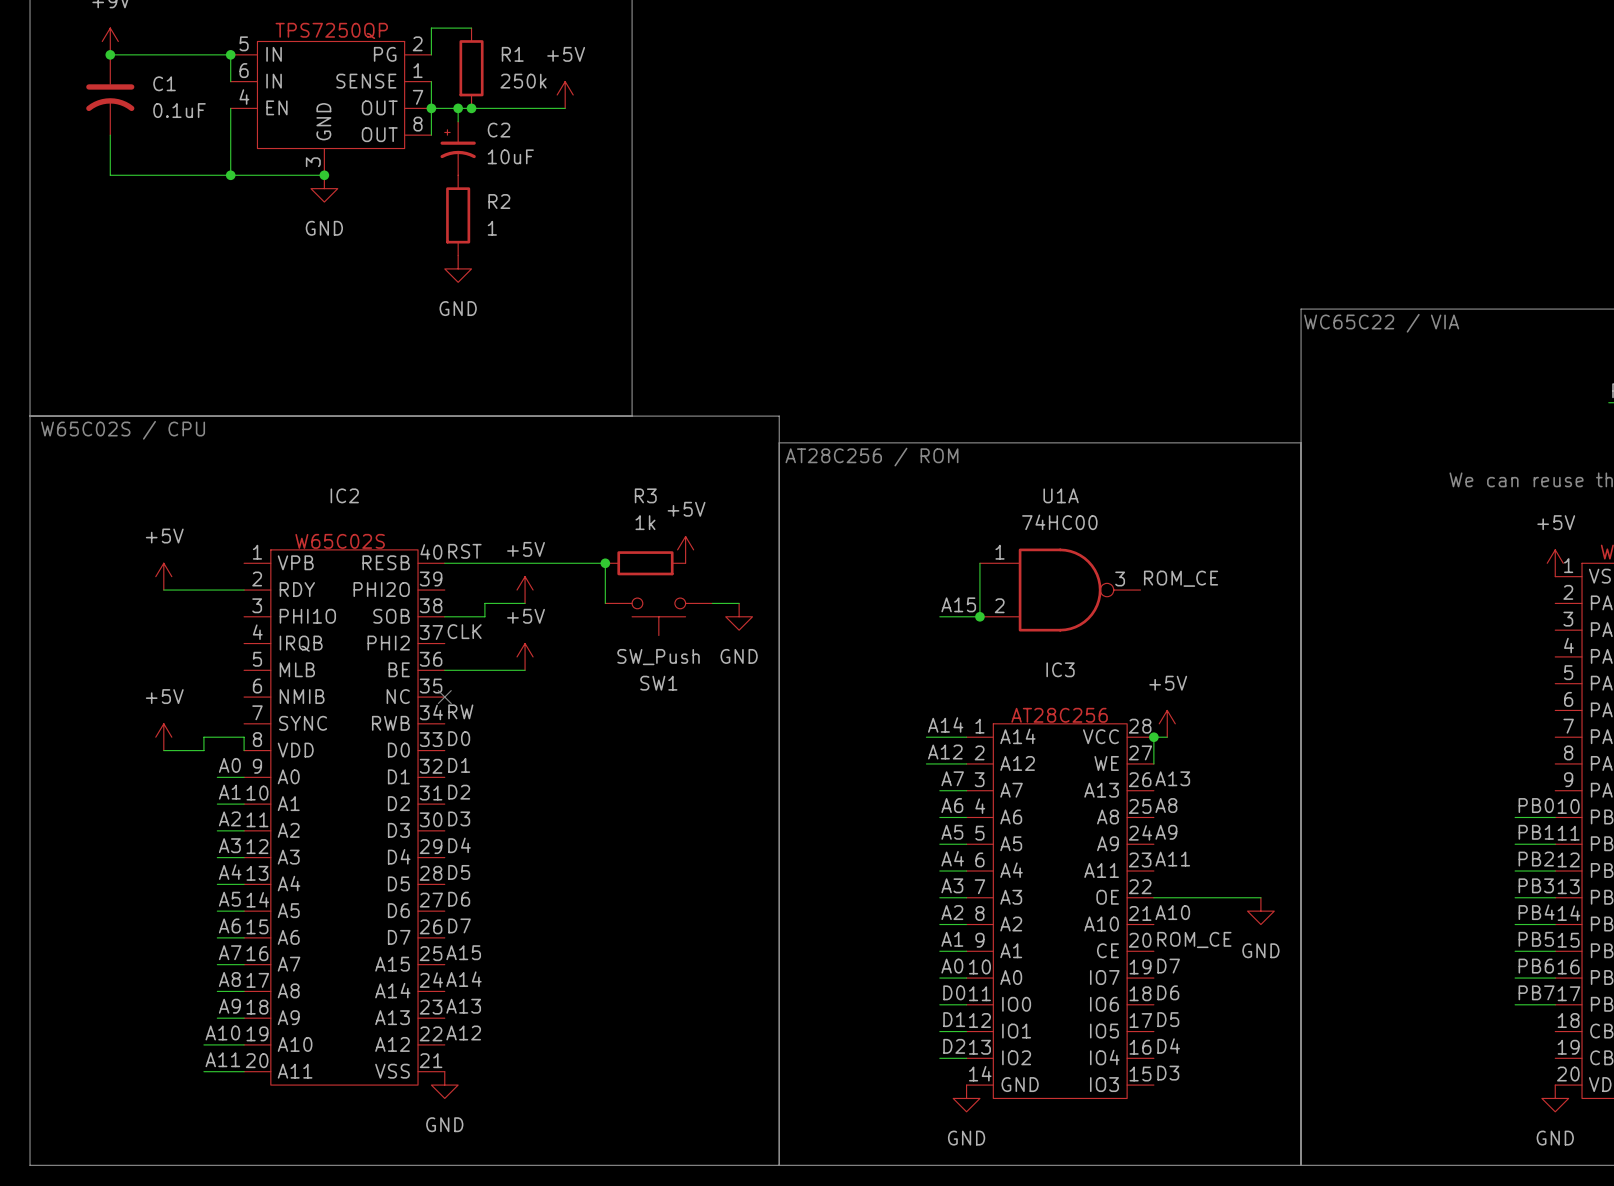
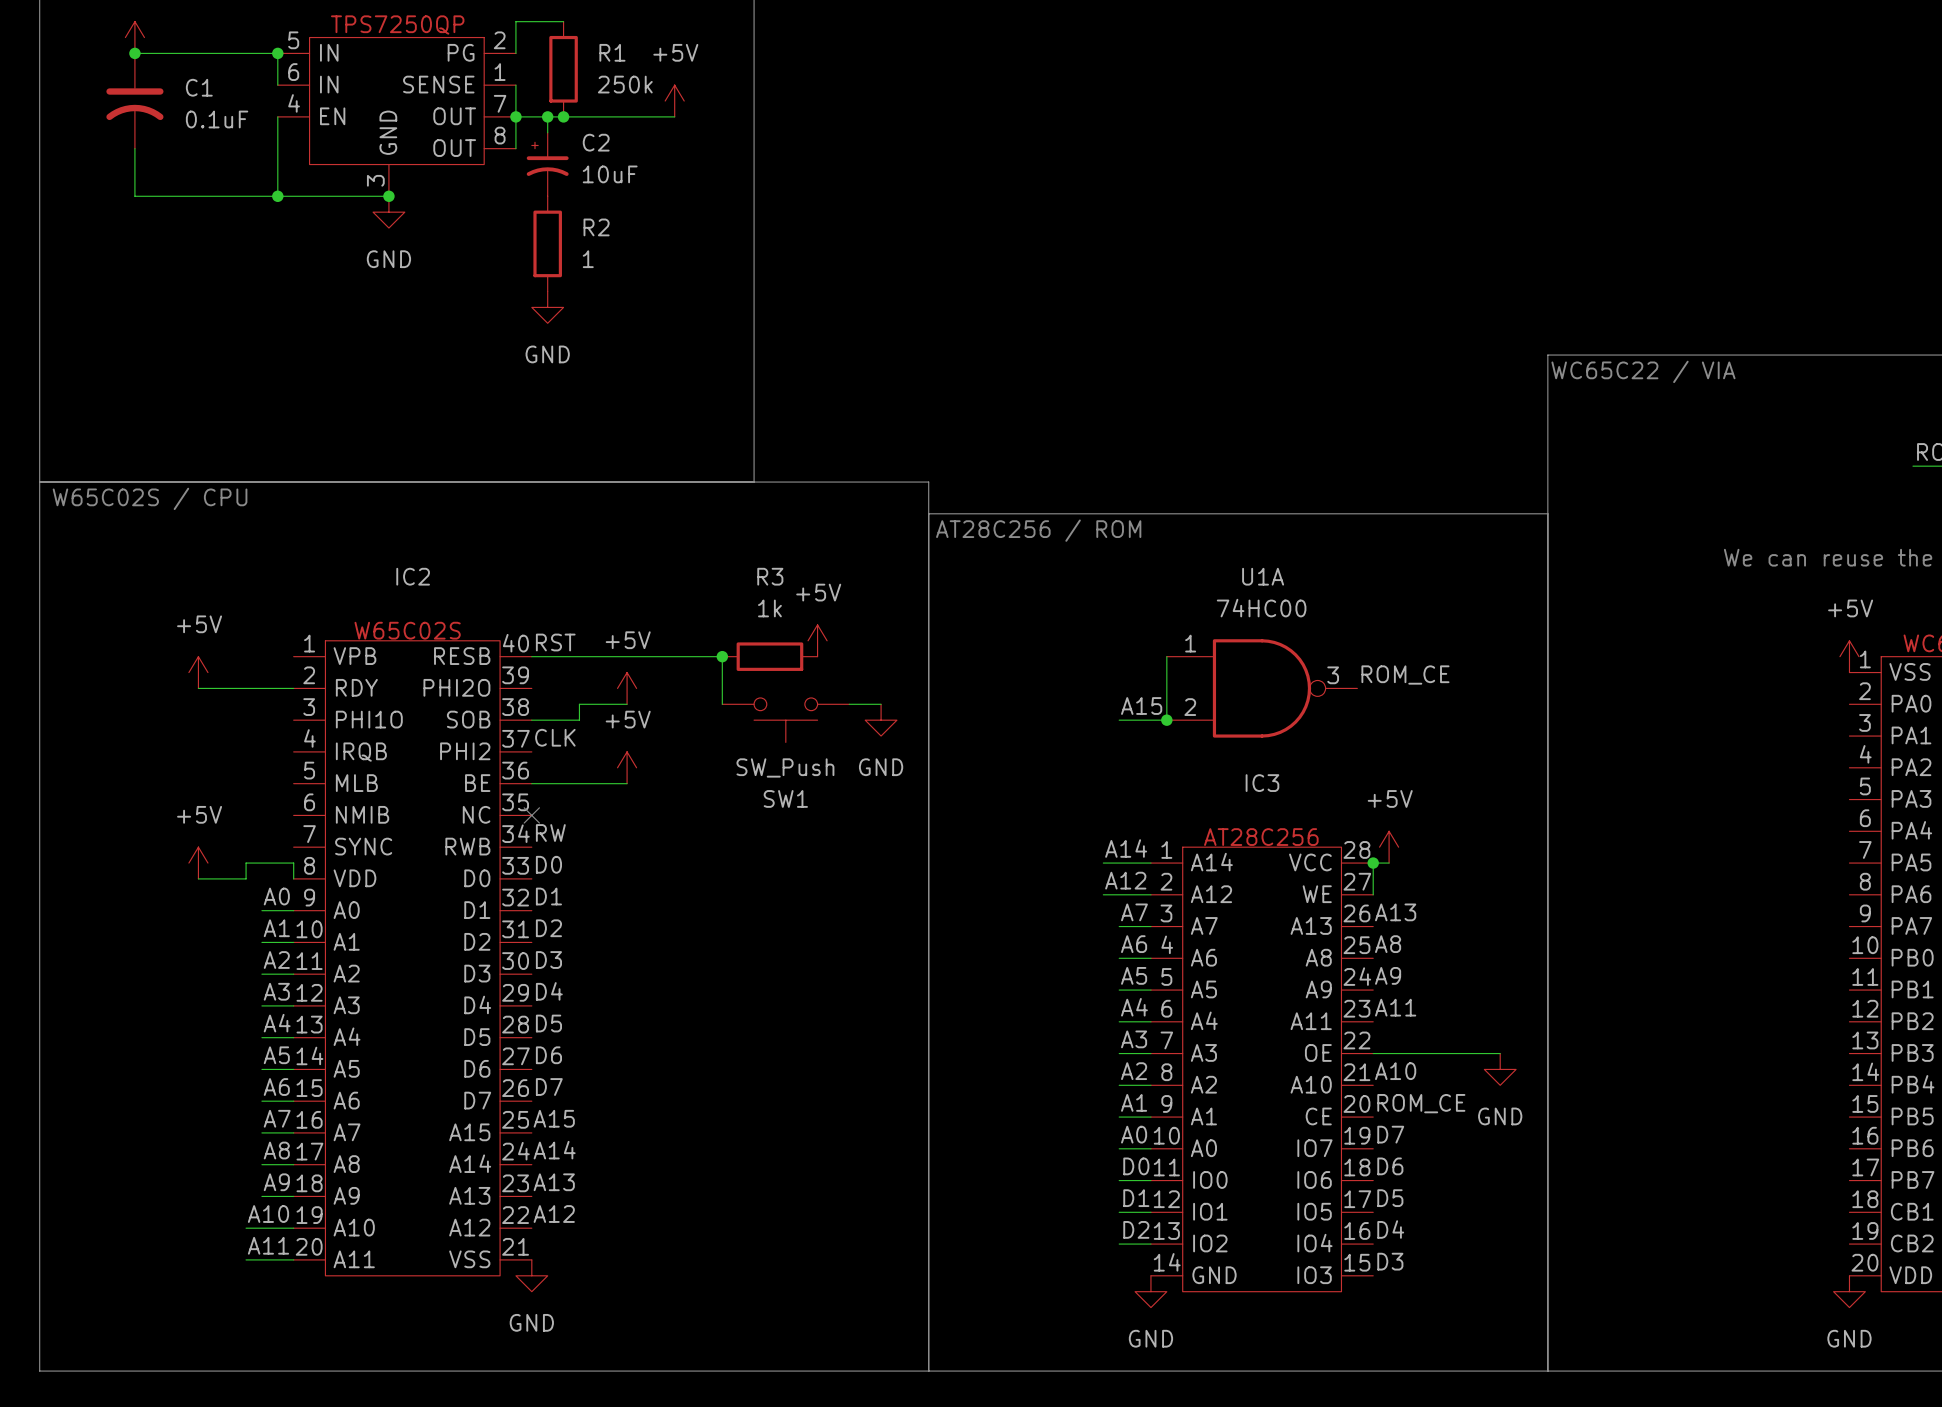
label: PB0 (1536, 805) -> none
wire: (1515, 817) (1555, 817) -> none
label: PB1 (1536, 832) -> none
wire: (1515, 844) (1555, 844) -> none
label: PB2 (1536, 859) -> none
wire: (1515, 871) (1555, 871) -> none
label: PB3 (1536, 885) -> none
wire: (1515, 897) (1555, 897) -> none
label: PB4 (1536, 912) -> none
wire: (1515, 924) (1555, 924) -> none
label: PB5 (1536, 939) -> none
wire: (1515, 951) (1555, 951) -> none
label: PB6 (1536, 966) -> none
wire: (1515, 978) (1555, 978) -> none
label: PB7 (1536, 992) -> none
wire: (1515, 1004) (1555, 1004) -> none

